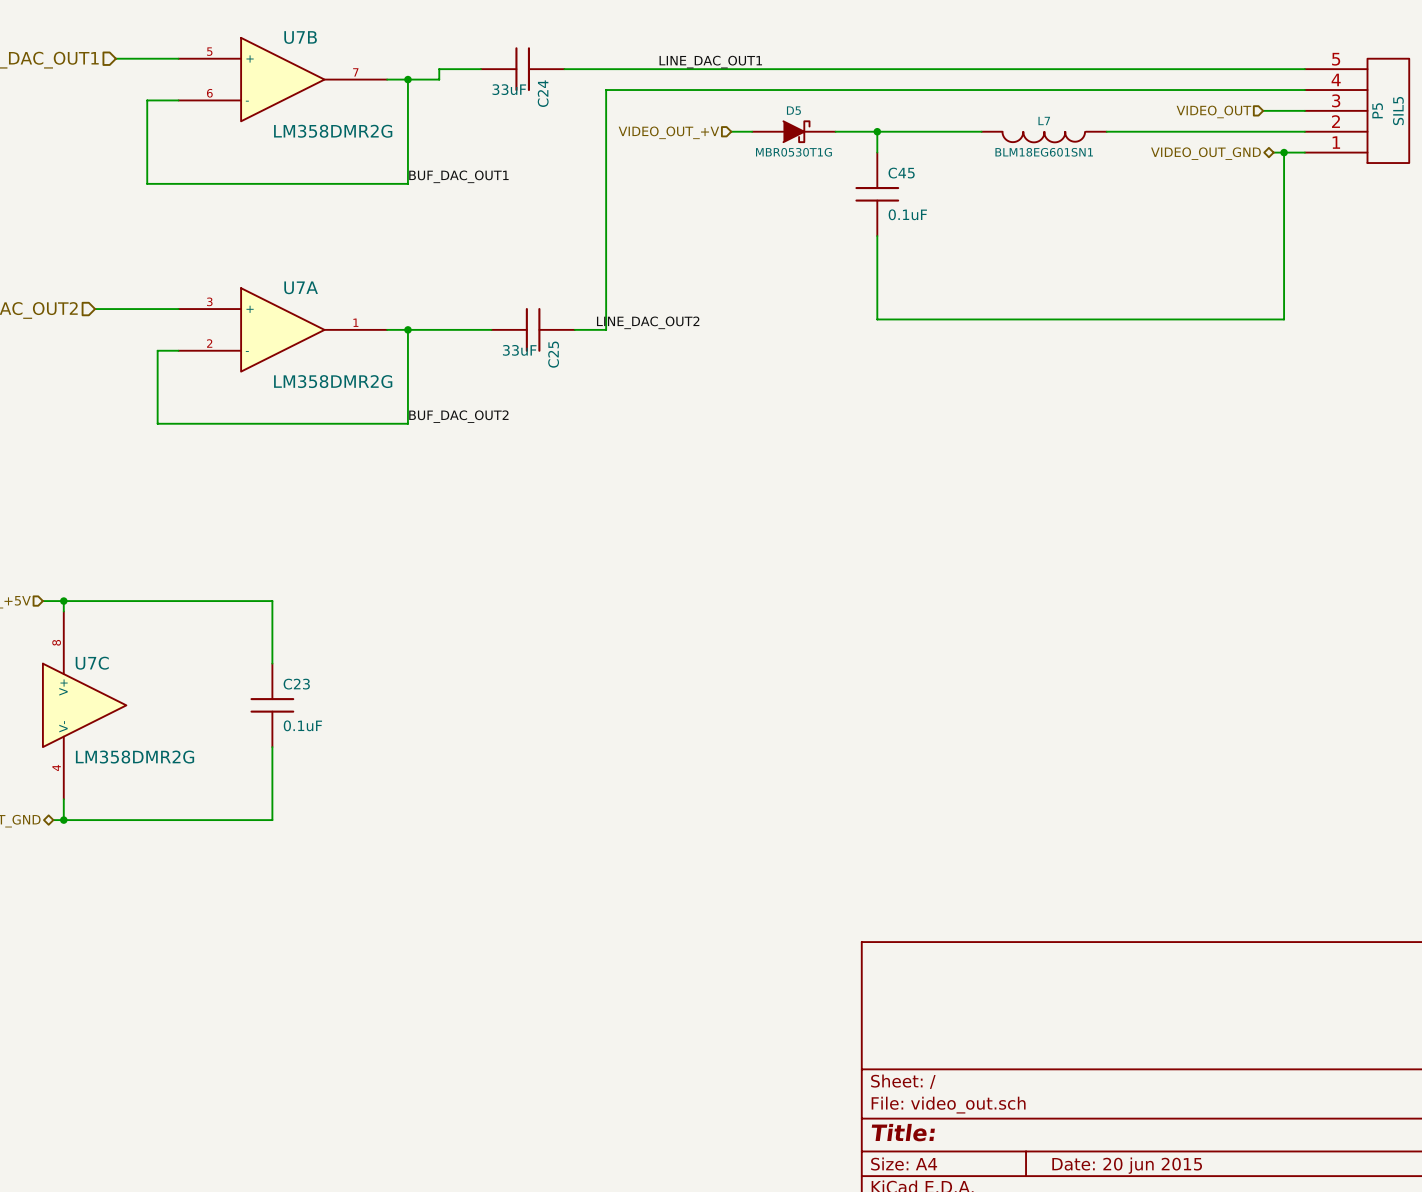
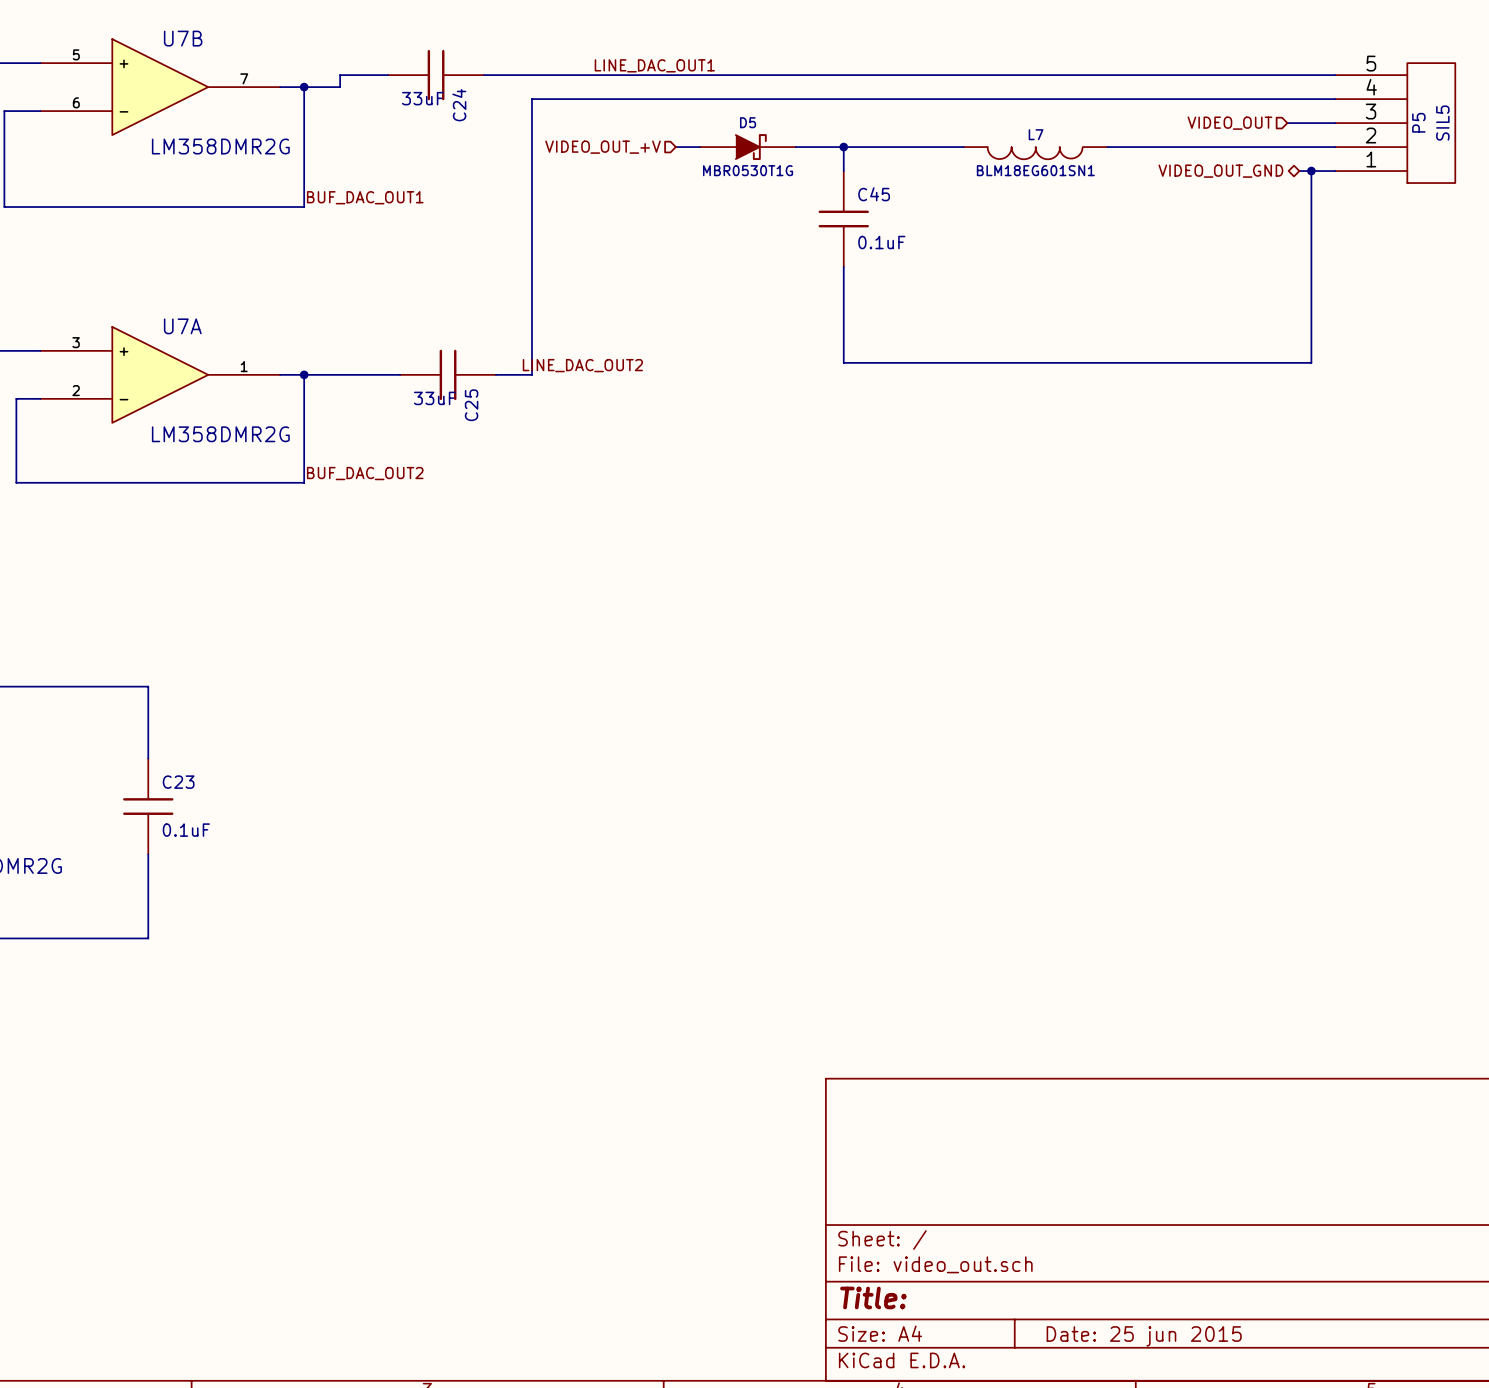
title block: Date: 20 jun 2015 (1127, 1165) -> Date: 25 jun 2015 (1144, 1336)

